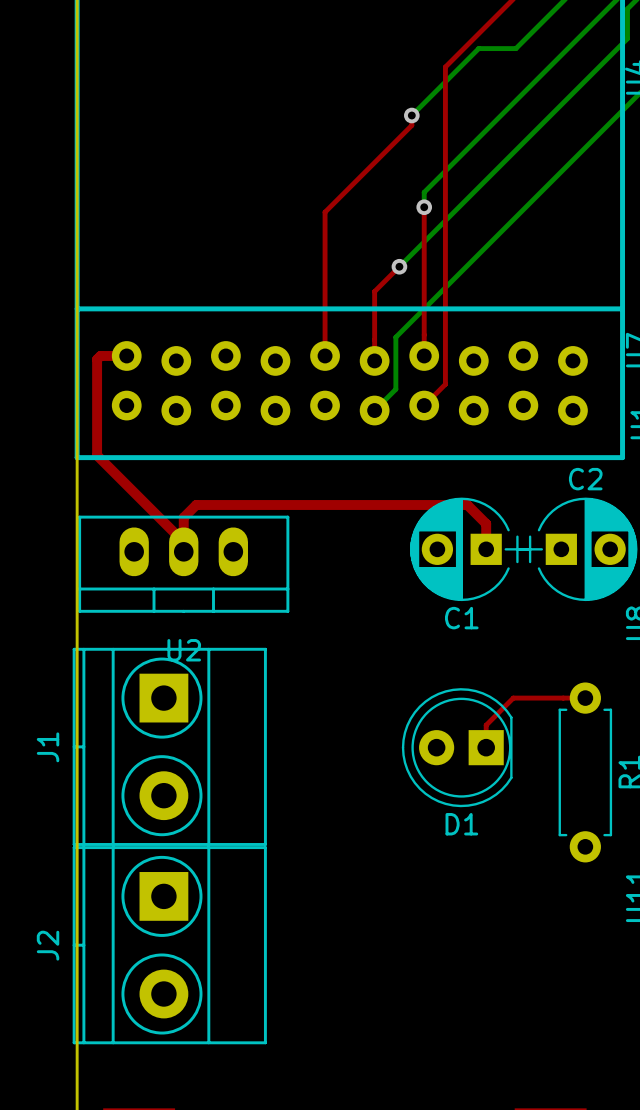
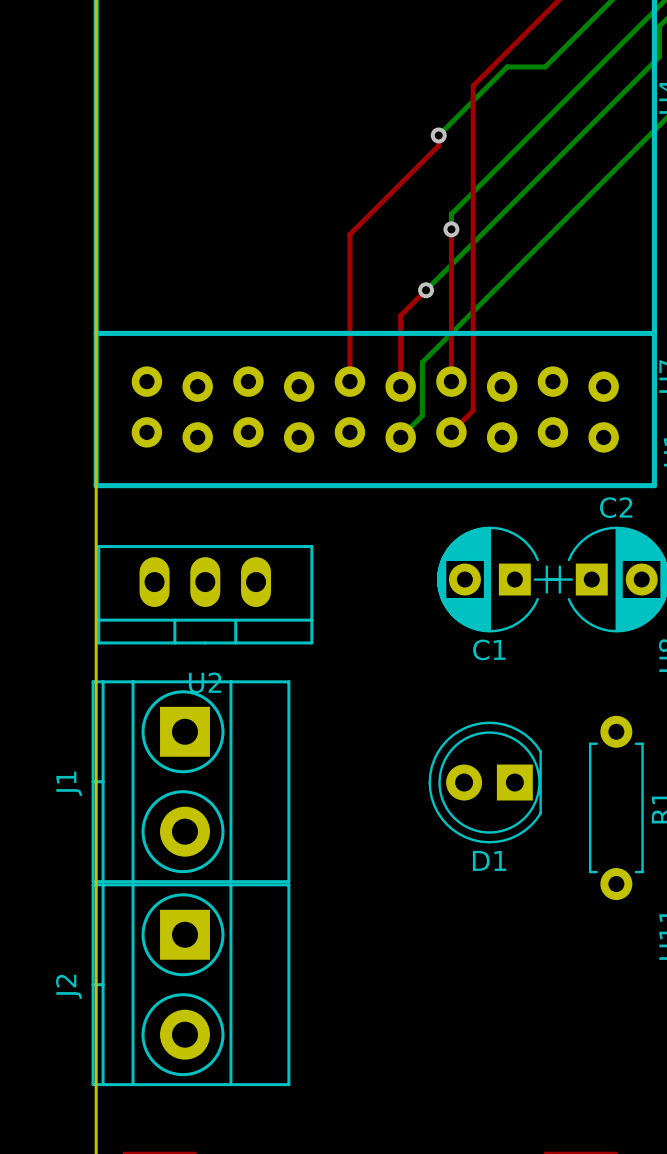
top track: (126, 355) (100, 355) (97, 359) (97, 455) (183, 542) -> none
top track: (486, 549) (486, 523) (467, 504) (196, 504) (183, 517) (183, 551) -> none
top track: (585, 698) (513, 698) (486, 725) (486, 747) -> none

